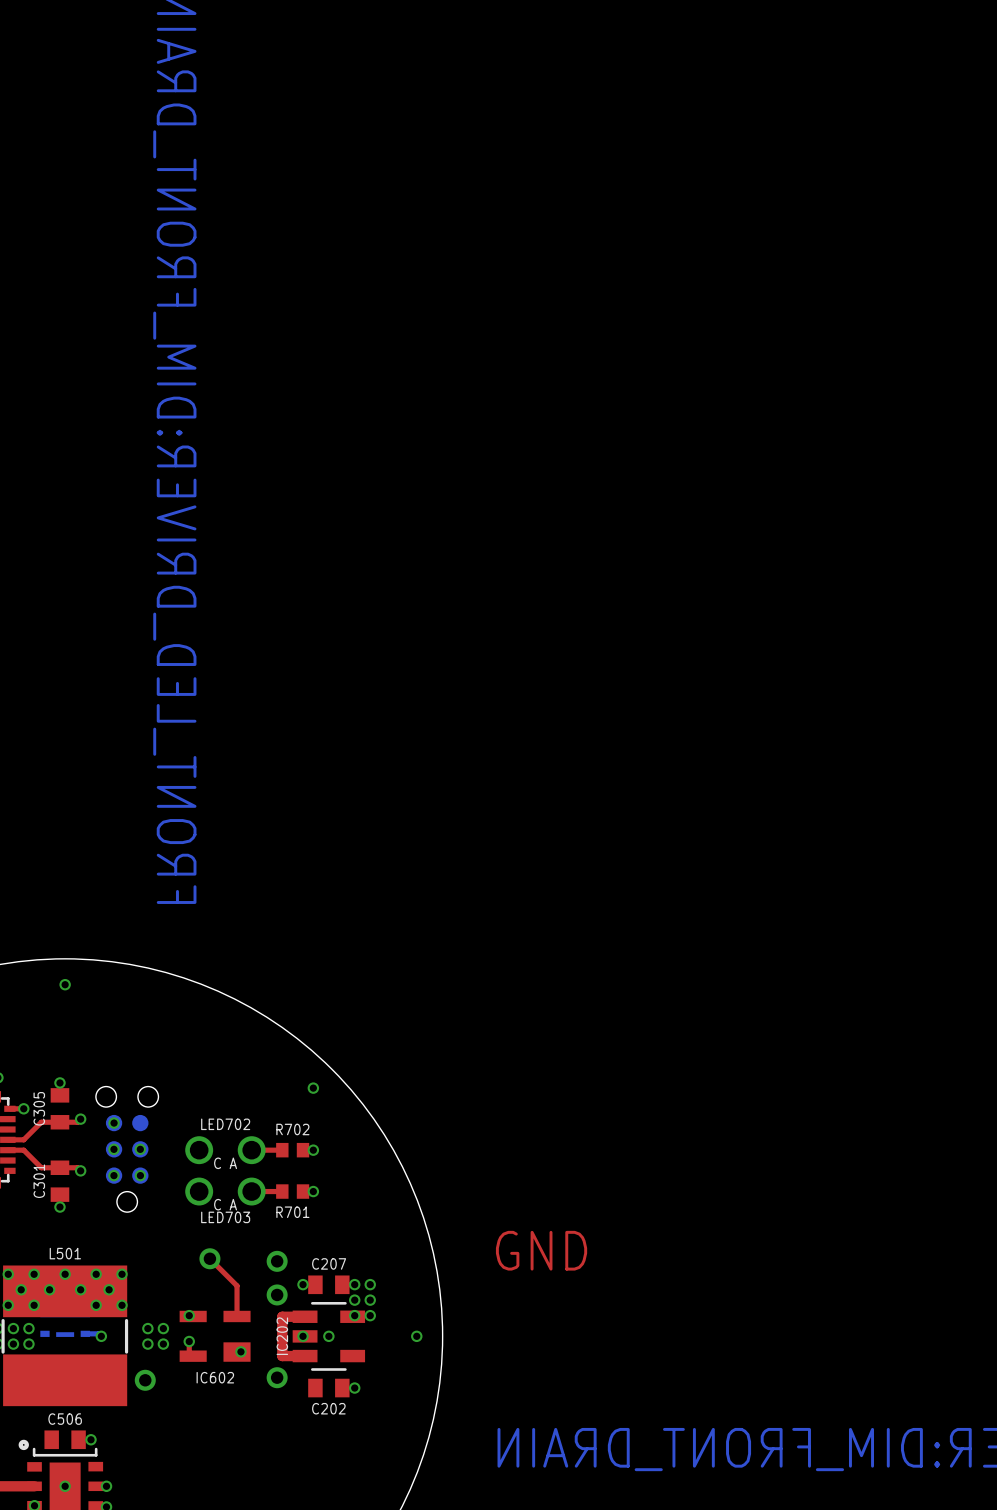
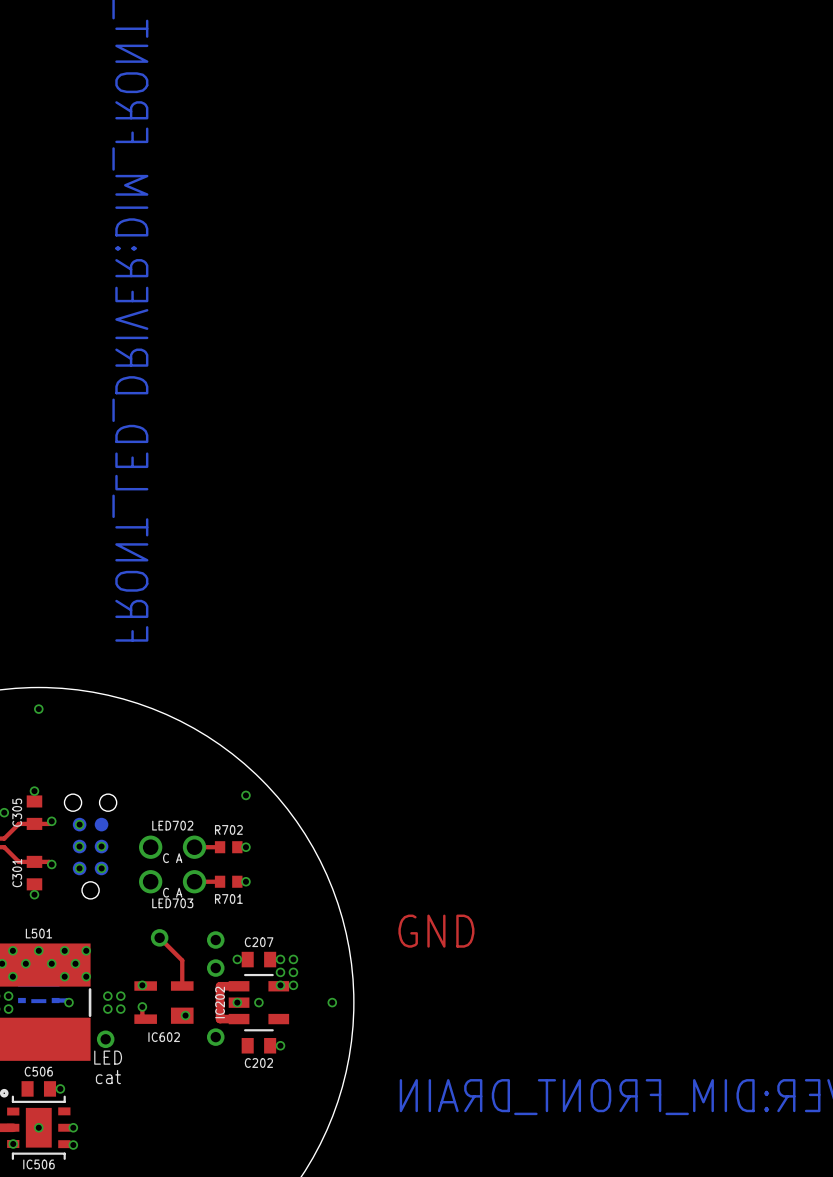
text: none -> LED (108, 1057)
text: none -> cat (108, 1077)

